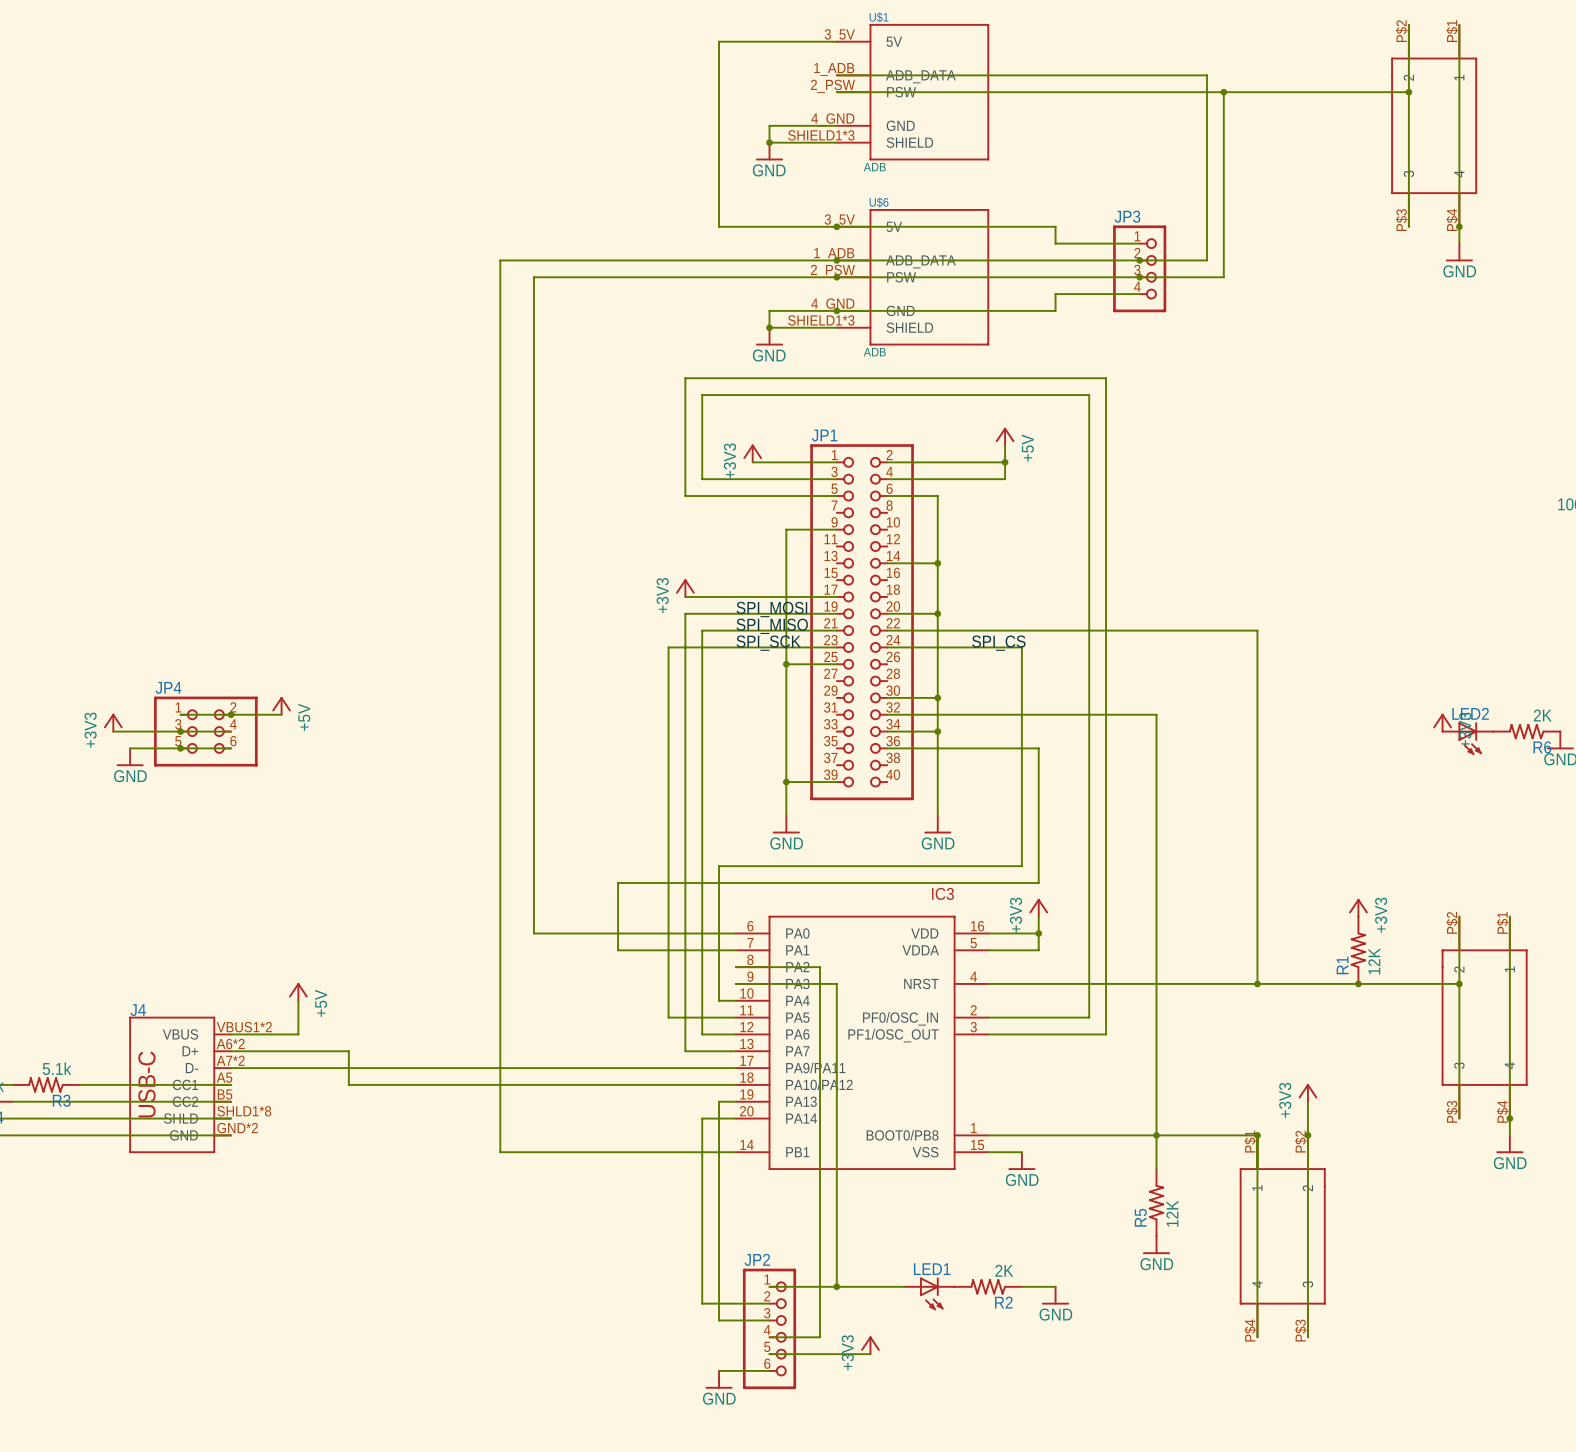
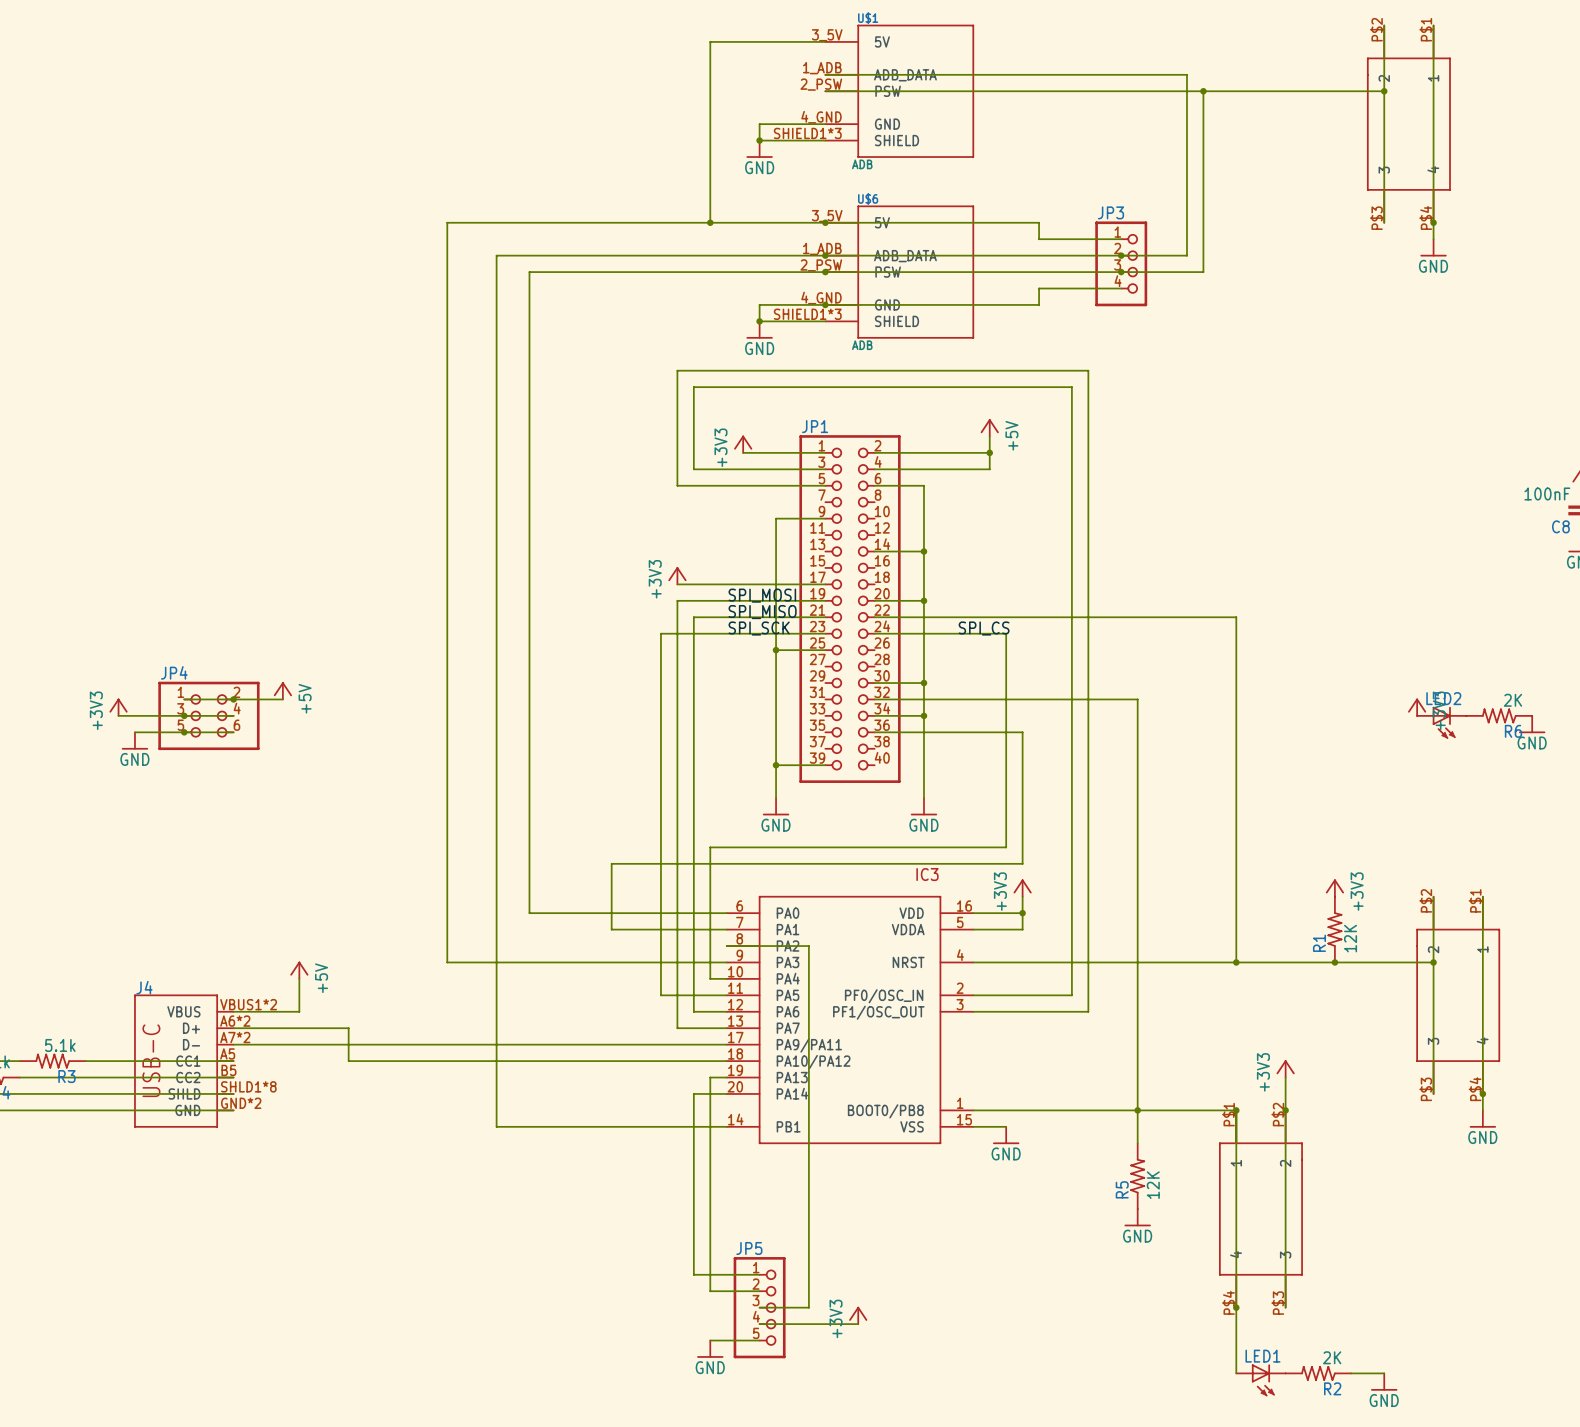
junction: none -> (710, 222)
wire: (735, 983) (836, 983) (836, 1286) -> (726, 962) (447, 962) (447, 222) (710, 222)
wire: (769, 1286) (904, 1286) -> none
junction: (836, 1286) -> none
R2 position: (988, 1286) -> (1318, 1373)
wire: (1021, 1286) (1055, 1286) -> none
LED1 position: (929, 1293) -> (1260, 1380)
power symbol: GND (1055, 1295) -> none
JP2: (769, 1328) -> none
JP5: none -> (759, 1307)
wire: none -> (1236, 1307) (1236, 1373)
junction: none -> (1236, 1307)
wire: none -> (1351, 1373) (1384, 1373)
power symbol: none -> GND (1384, 1382)

